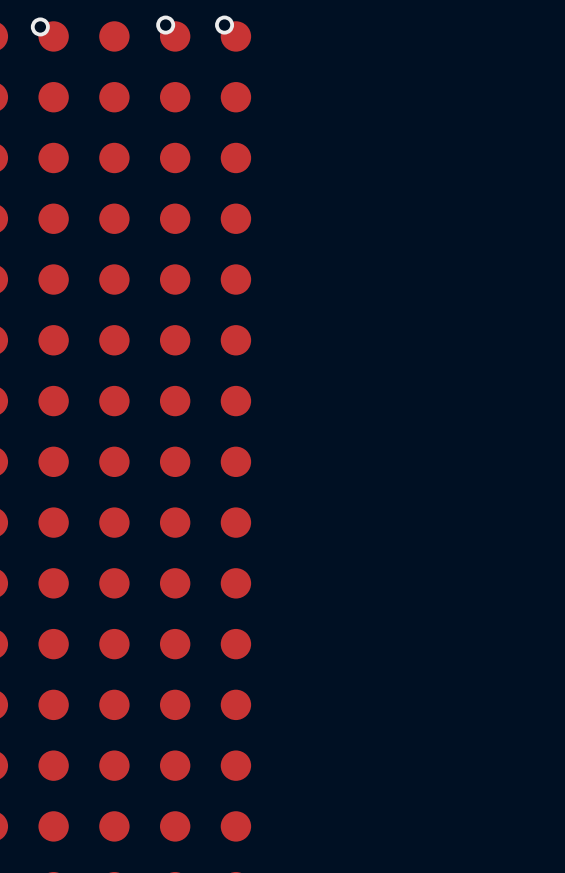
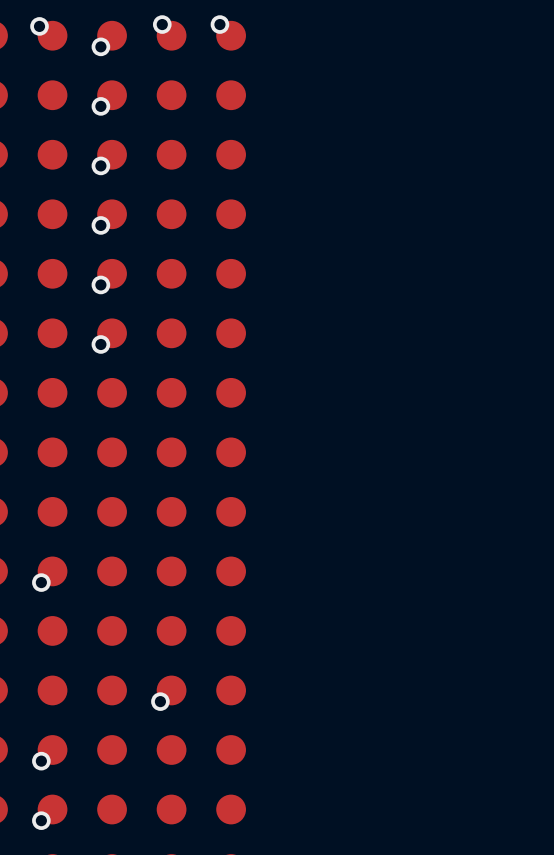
via: none -> (100, 46)
via: none -> (100, 106)
via: none -> (100, 165)
via: none -> (100, 225)
via: none -> (100, 284)
via: none -> (100, 344)
via: none -> (41, 582)
via: none -> (160, 701)
via: none -> (41, 761)
via: none -> (41, 820)

